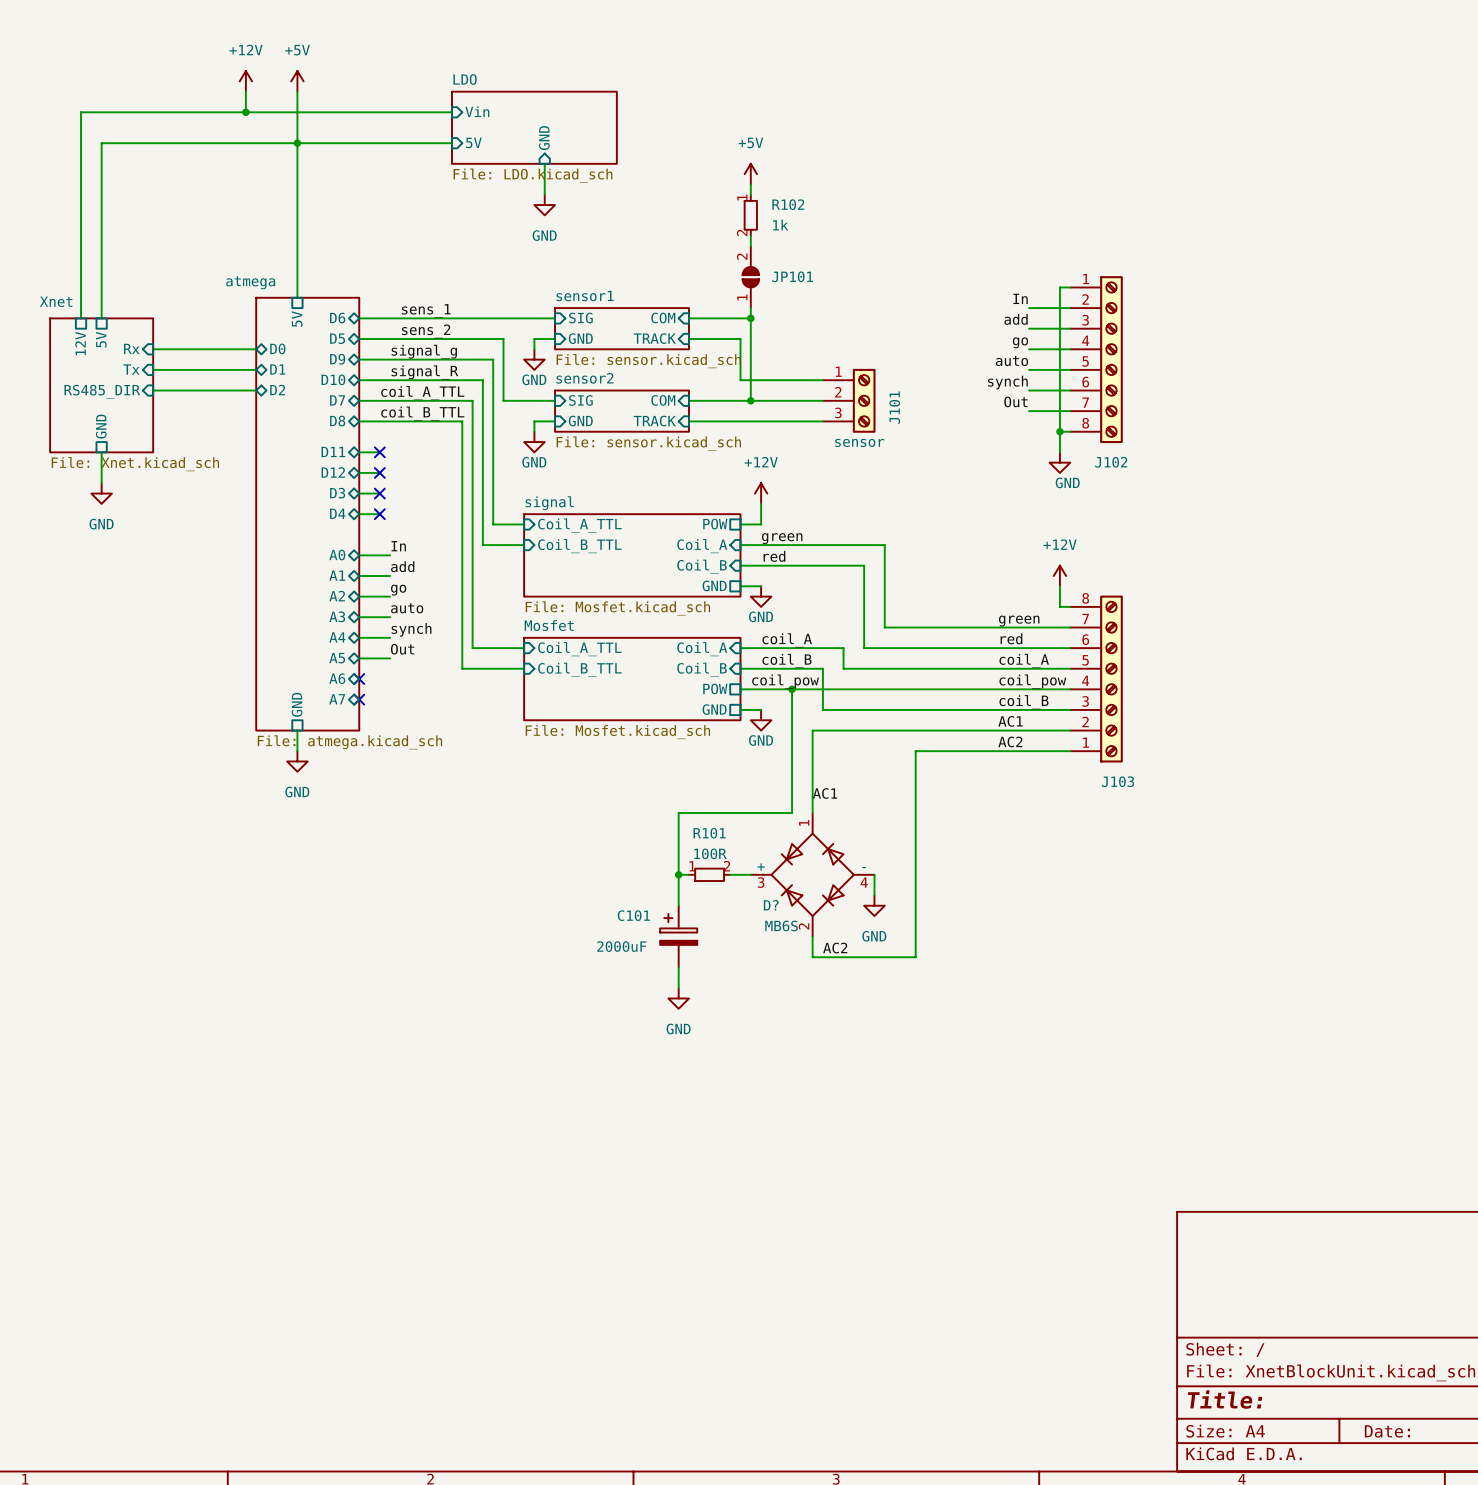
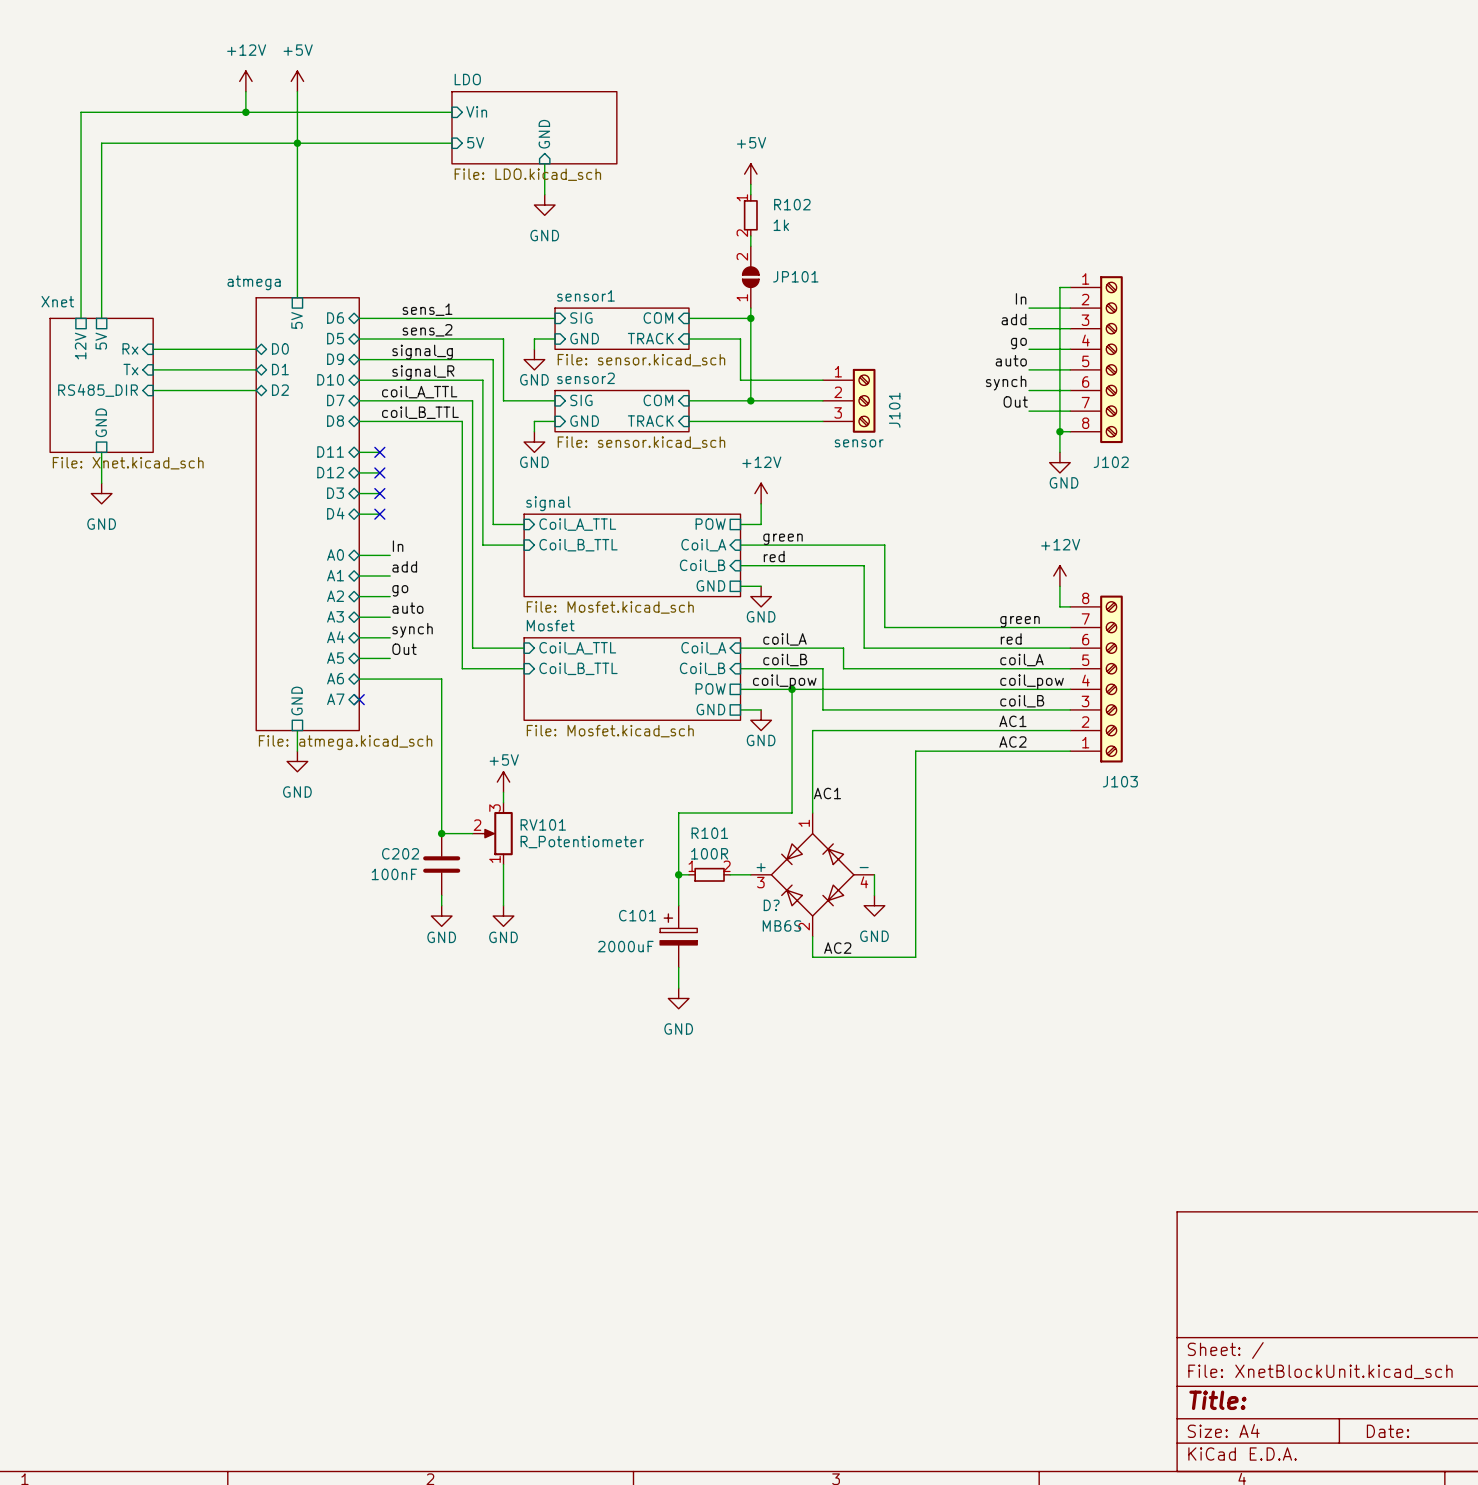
wire: none -> (359, 679) (441, 679) (441, 833) (472, 833)
no-connect mark: (359, 679) -> none
power symbol: none -> +5V (503, 782)
wire: none -> (503, 792) (503, 802)
junction: none -> (441, 833)
RV101: none -> R_Potentiometer (492, 833)
C202: none -> 100nF (441, 864)
wire: none -> (503, 864) (503, 905)
wire: none -> (441, 895) (441, 905)
power symbol: none -> GND (441, 916)
power symbol: none -> GND (503, 916)

